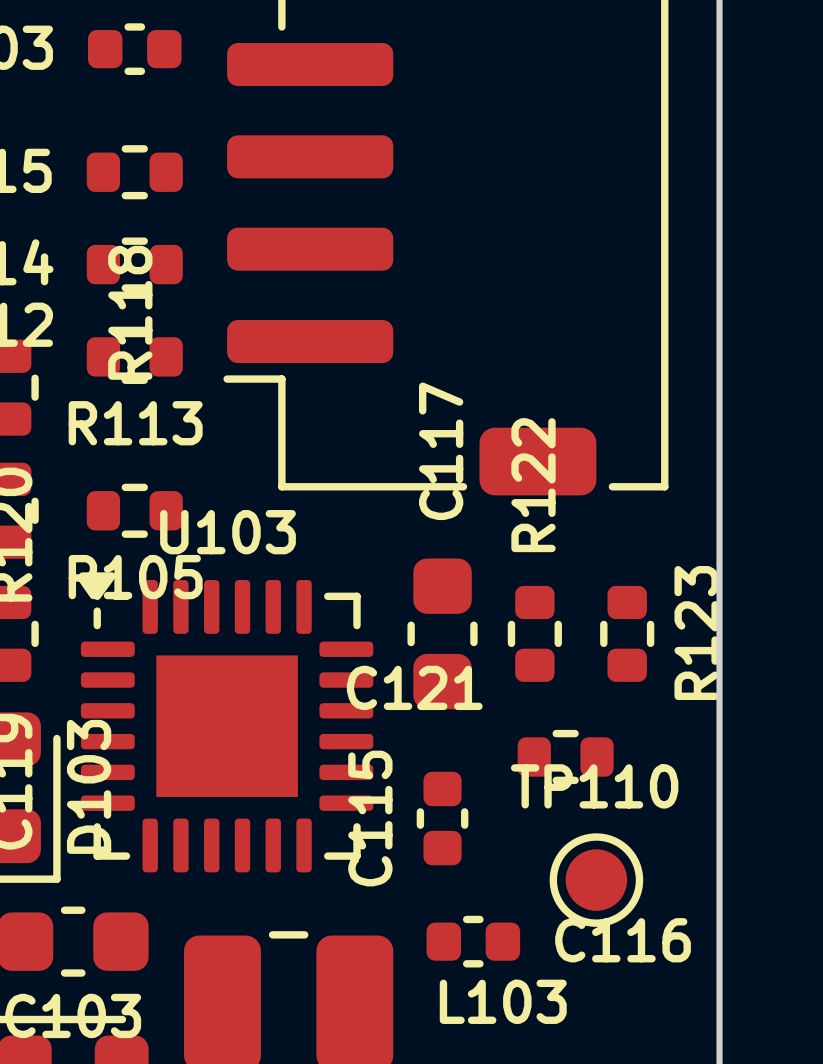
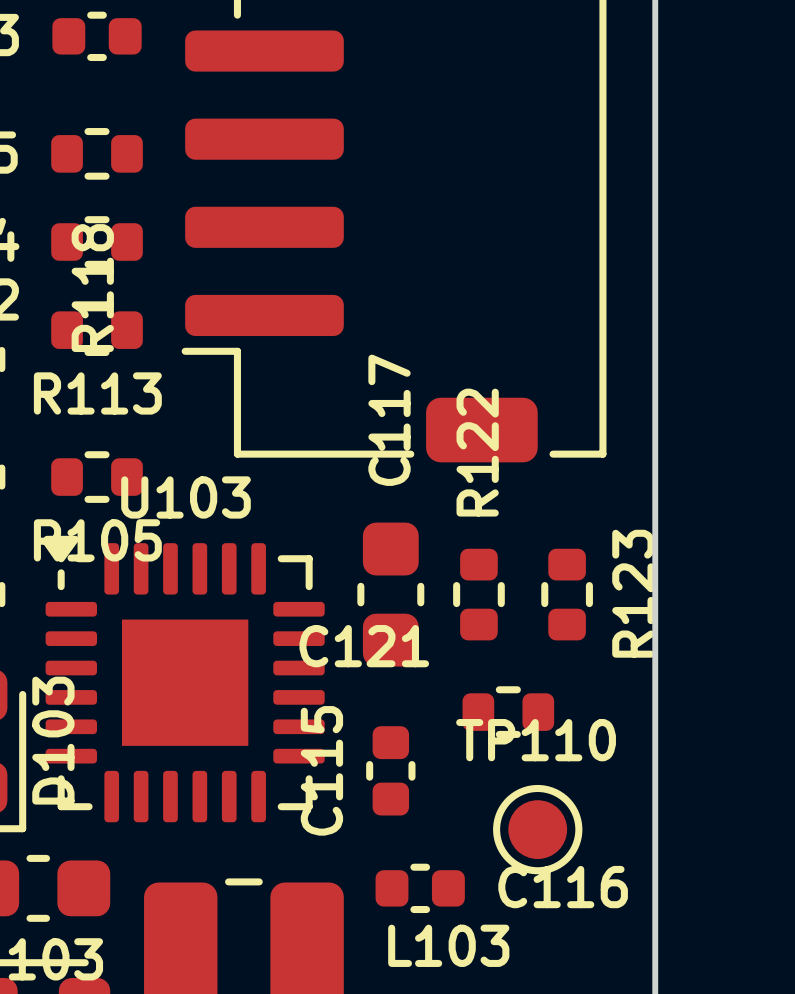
U103 footprint: [78, 572, 374, 873] -> [43, 535, 325, 823]

